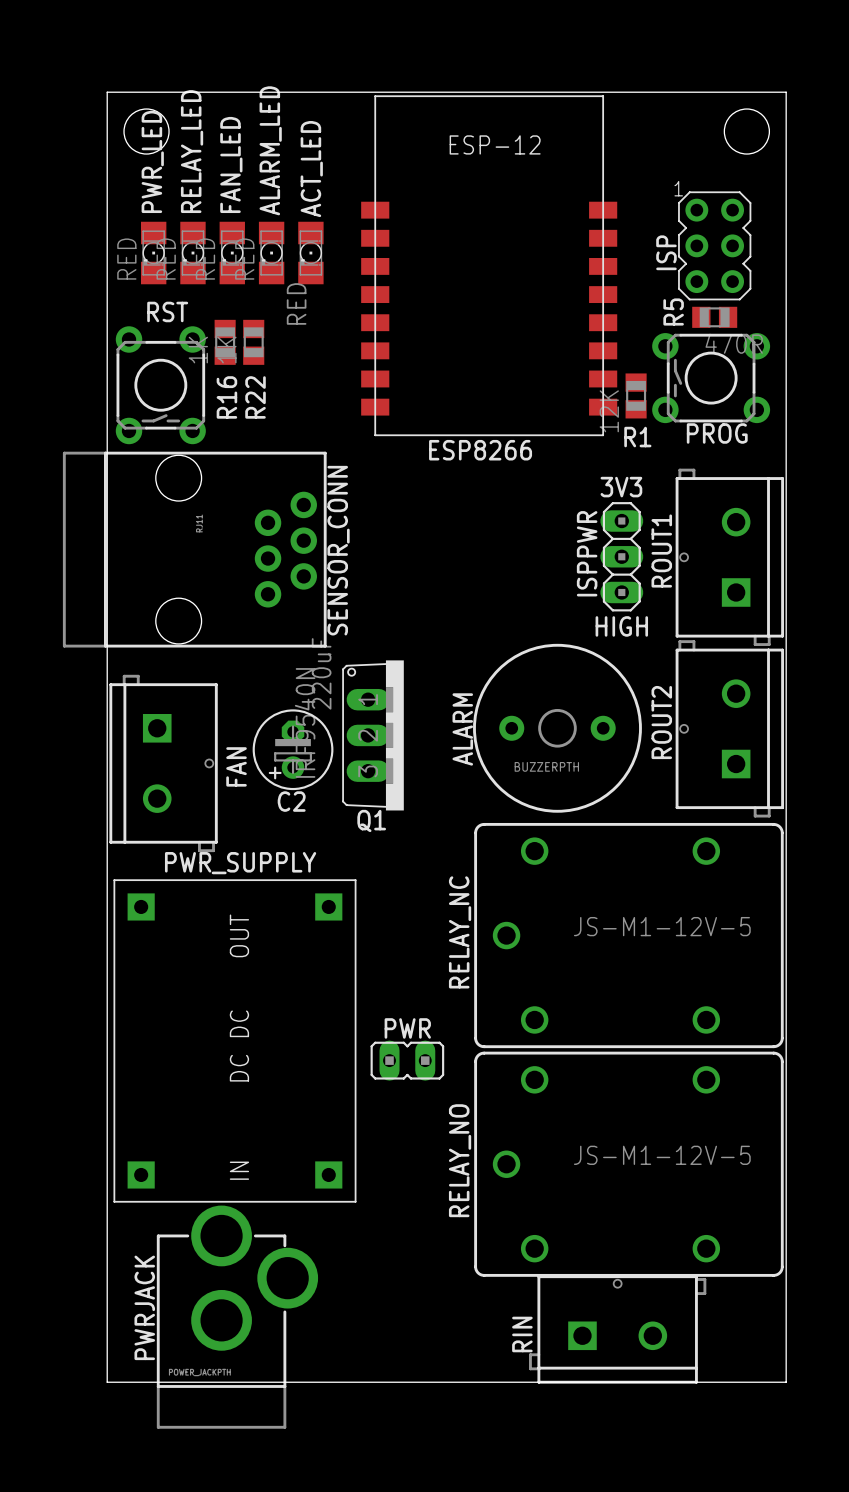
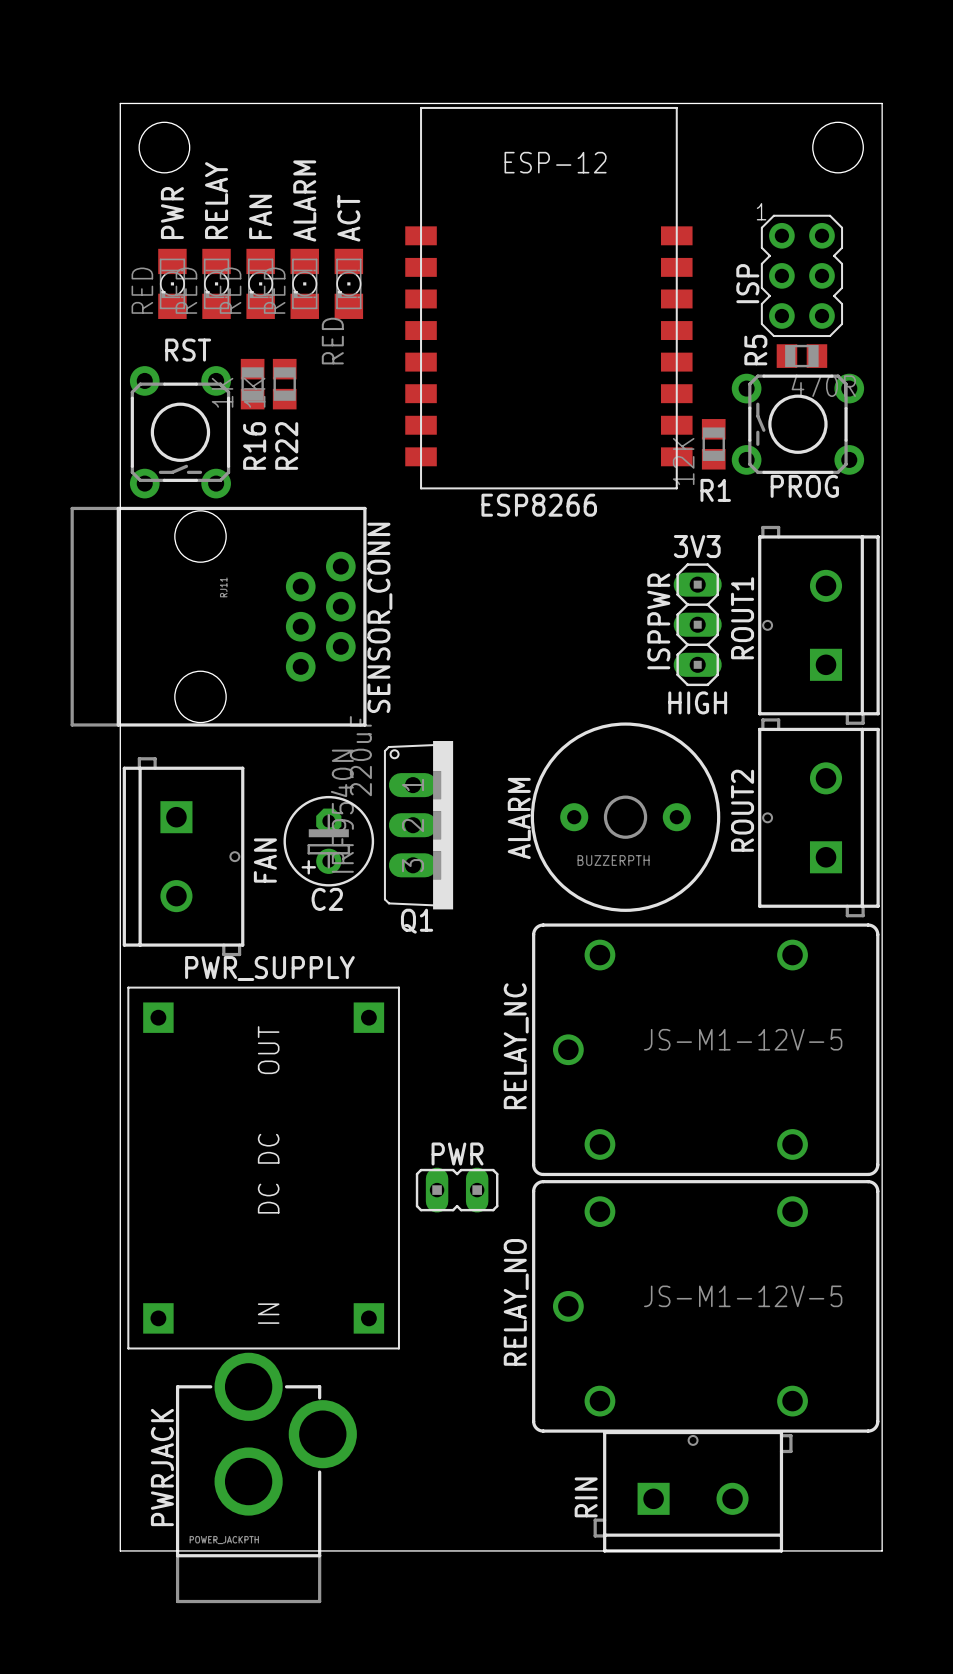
ALARM_LED name: ALARM_LED (270, 150) -> none
RELAY_LED name: RELAY_LED (192, 151) -> none
PWR_LED name: PWR_LED (152, 161) -> none
FAN_LED name: FAN_LED (231, 164) -> none
ACT_LED name: ACT_LED (311, 169) -> none
text: none -> RELAY (216, 200)
text: none -> ALARM (304, 201)
text: none -> PWR (172, 213)
text: none -> FAN (260, 216)
text: none -> ACT (348, 218)

